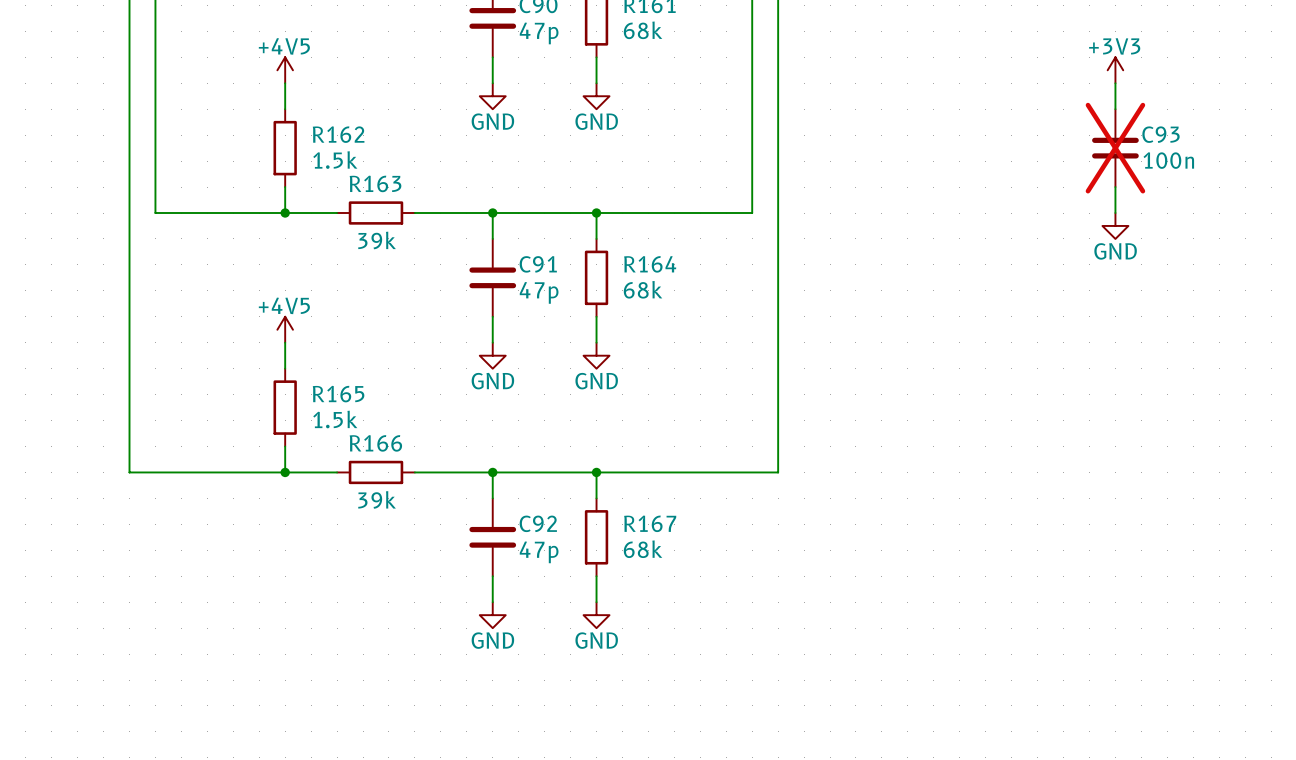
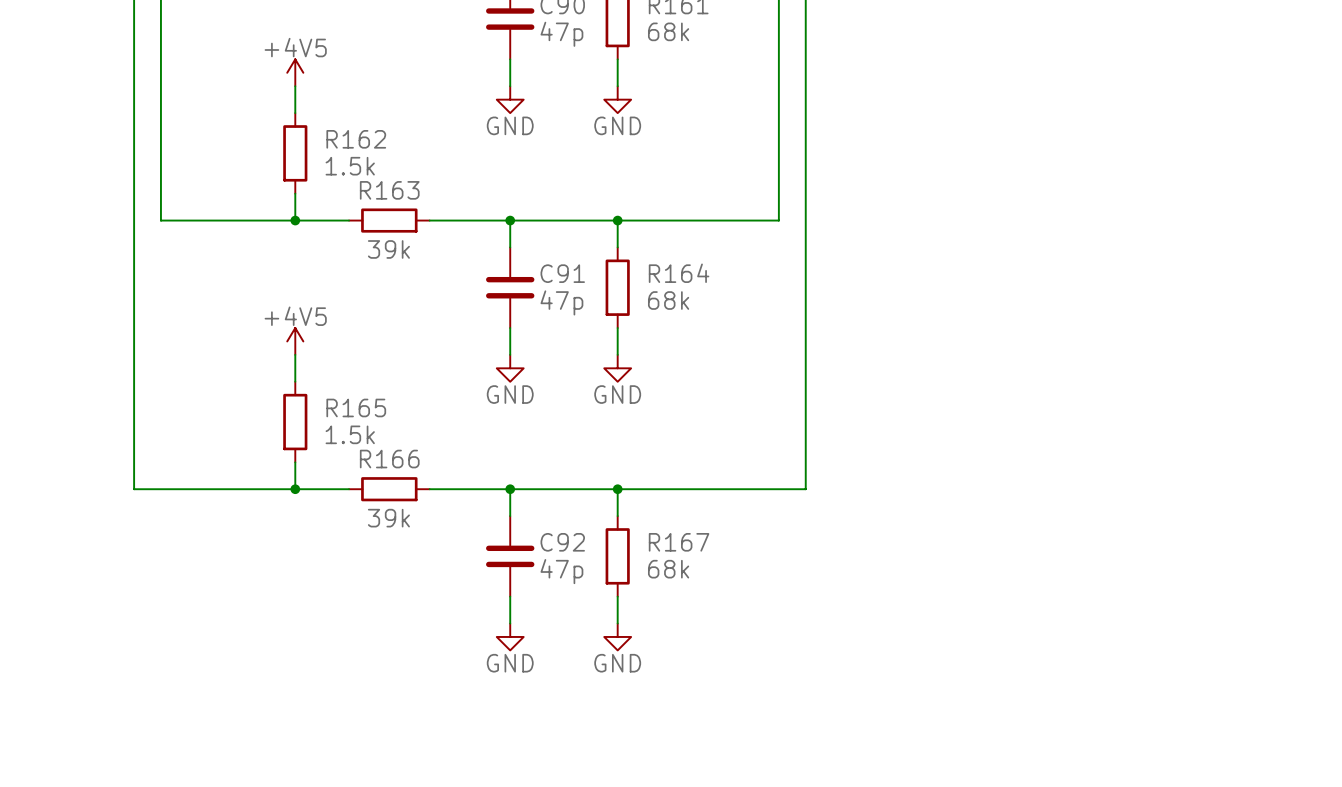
power symbol: +3V3 (1115, 70) -> none
wire: (1115, 83) (1115, 109) -> none
C93: 100n (1115, 148) -> none
wire: (1115, 187) (1115, 213) -> none
power symbol: GND (1115, 225) -> none

